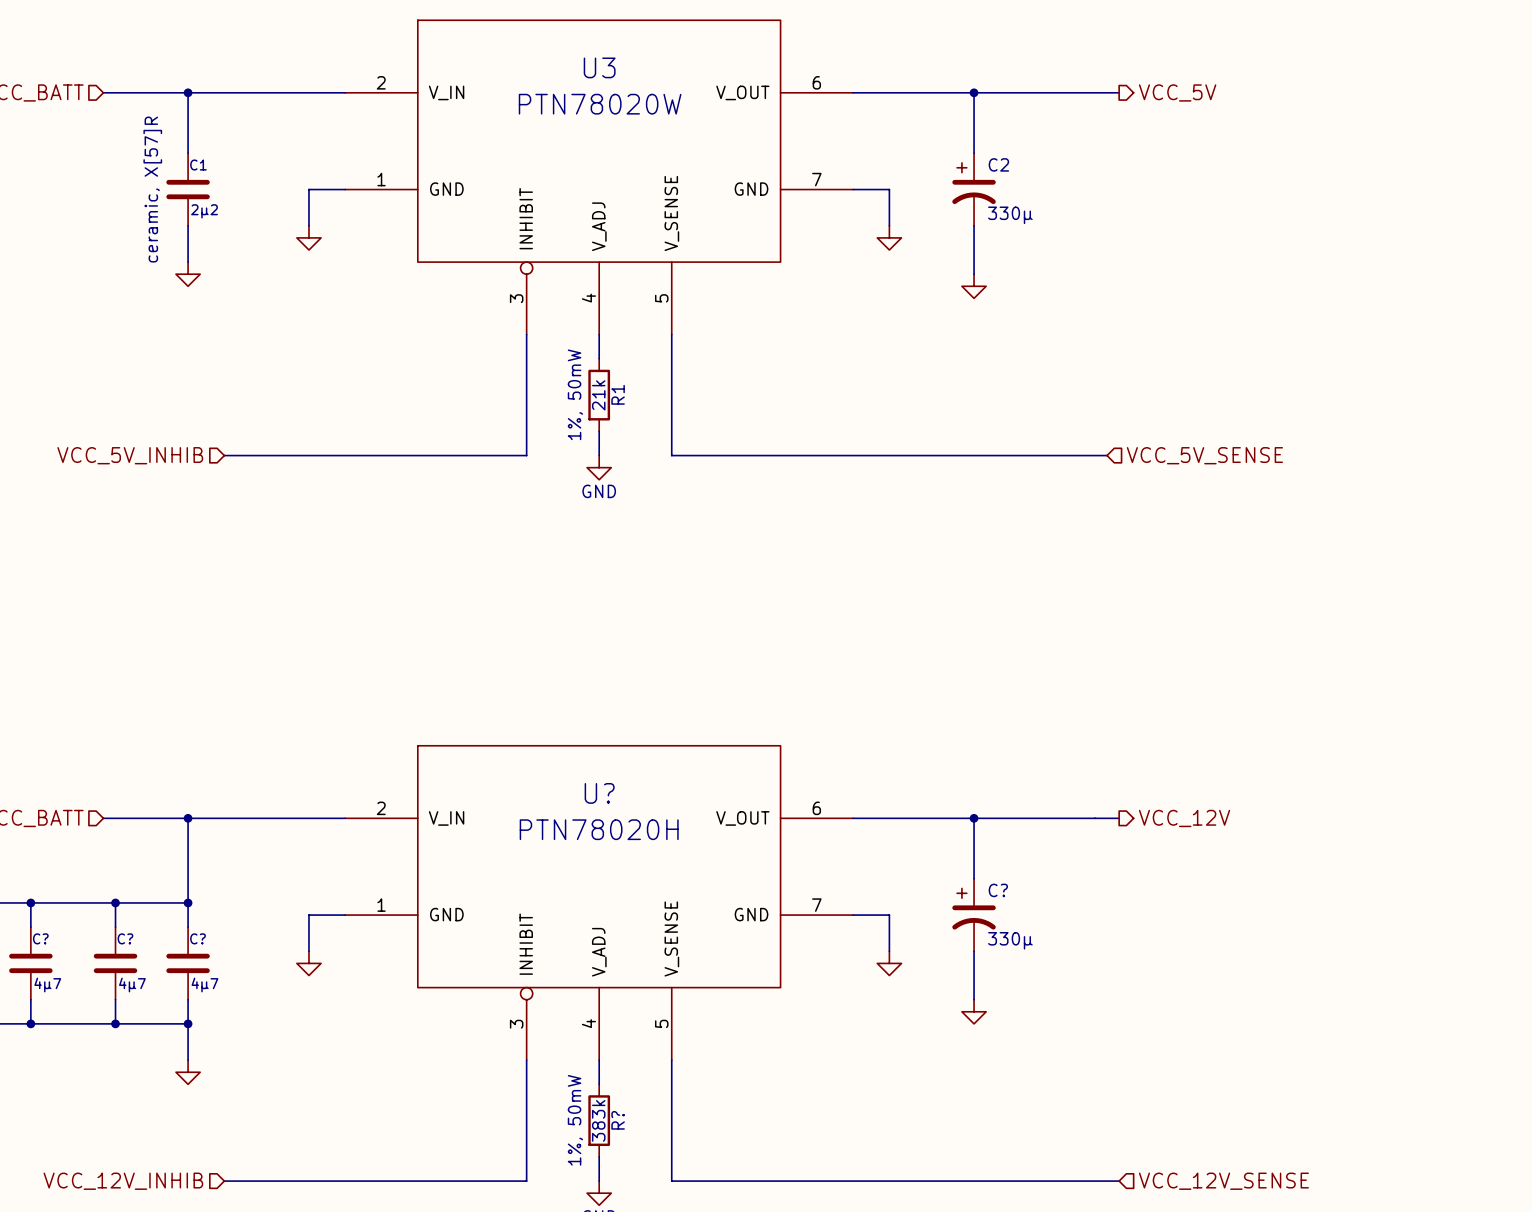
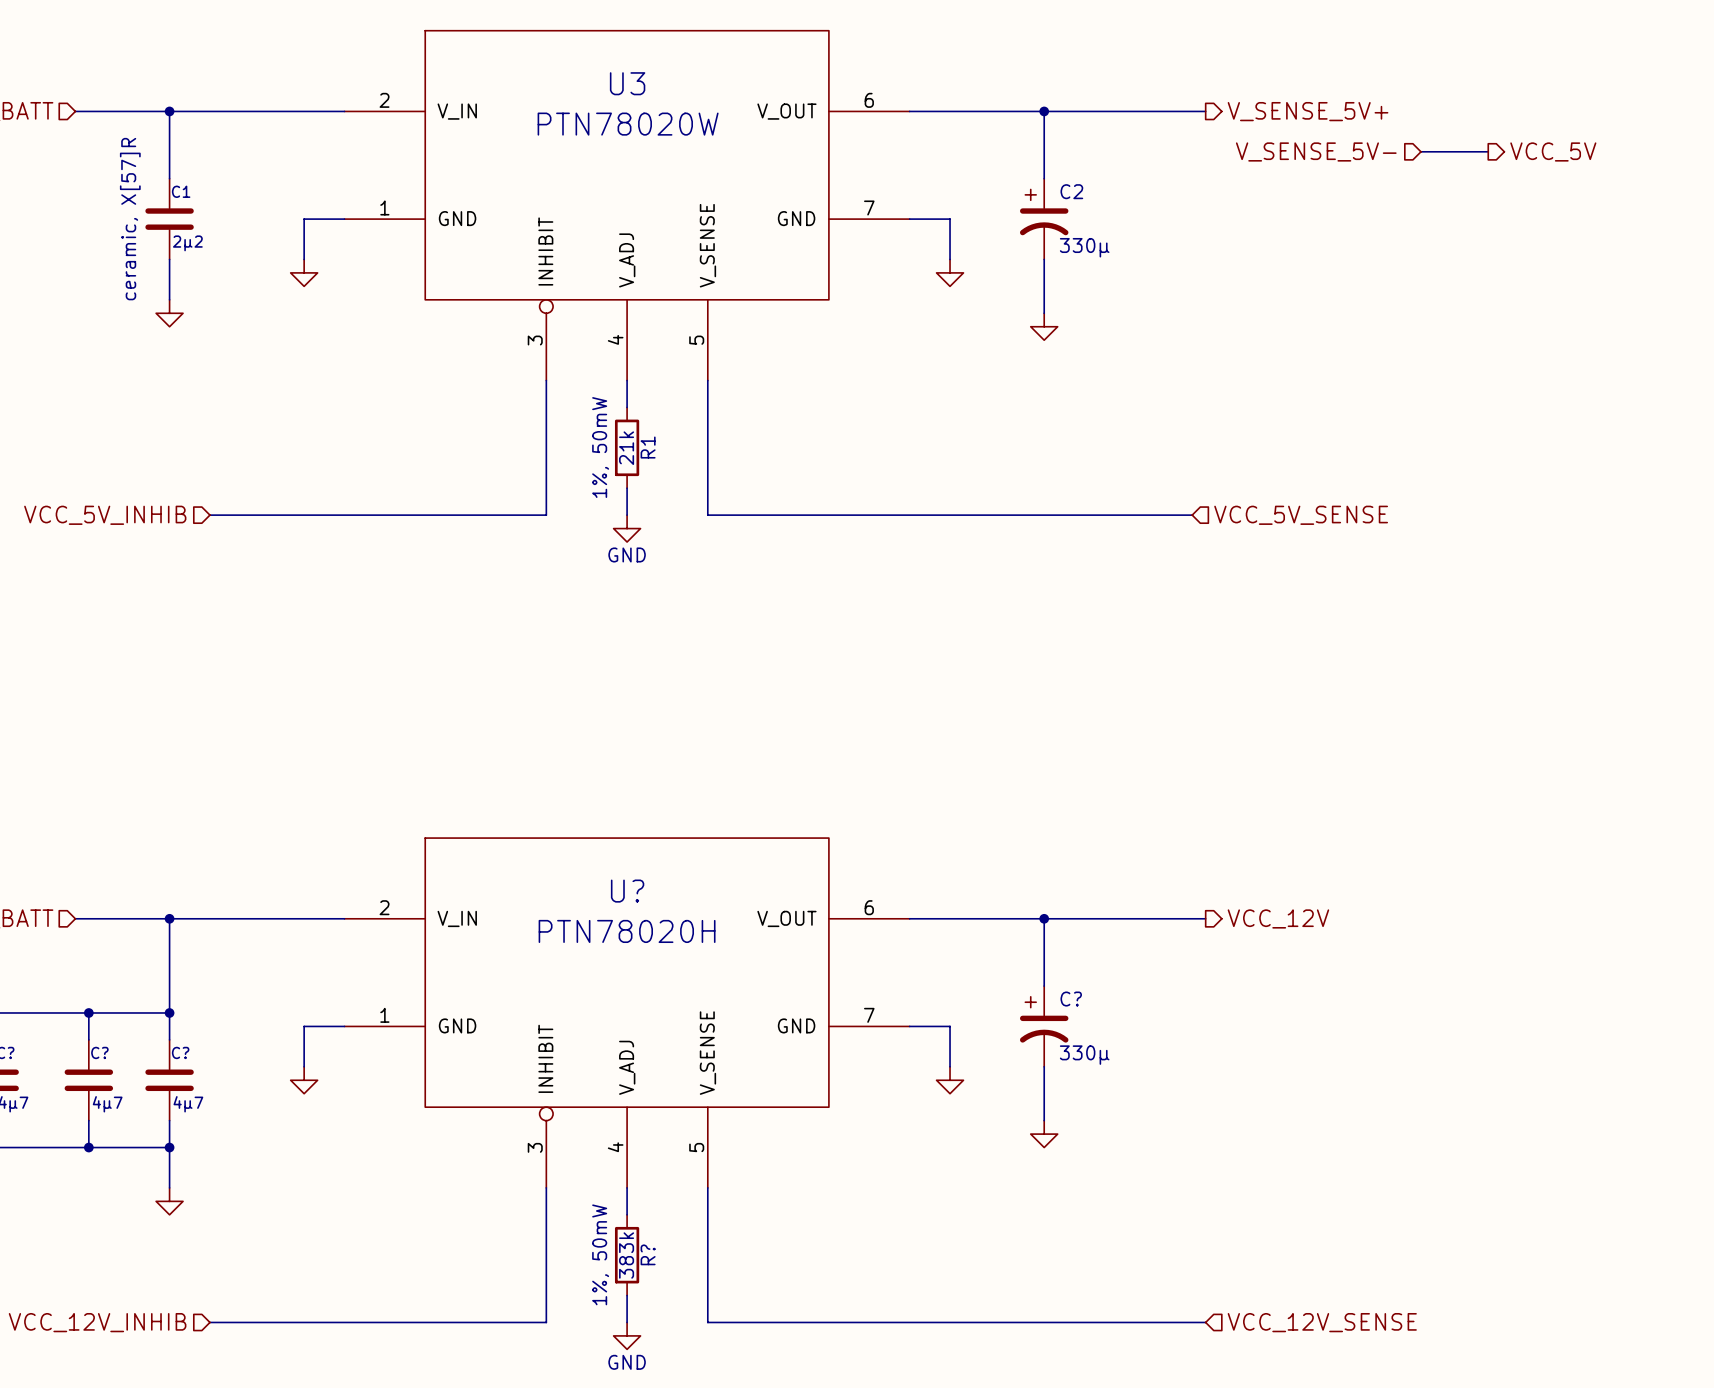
hierarchical label: VCC_5V (1177, 92) -> V_SENSE_5V+ (1308, 111)
hierarchical label: none -> V_SENSE_5V- (1316, 151)
wire: none -> (1420, 151) (1488, 151)
hierarchical label: none -> VCC_5V (1553, 151)

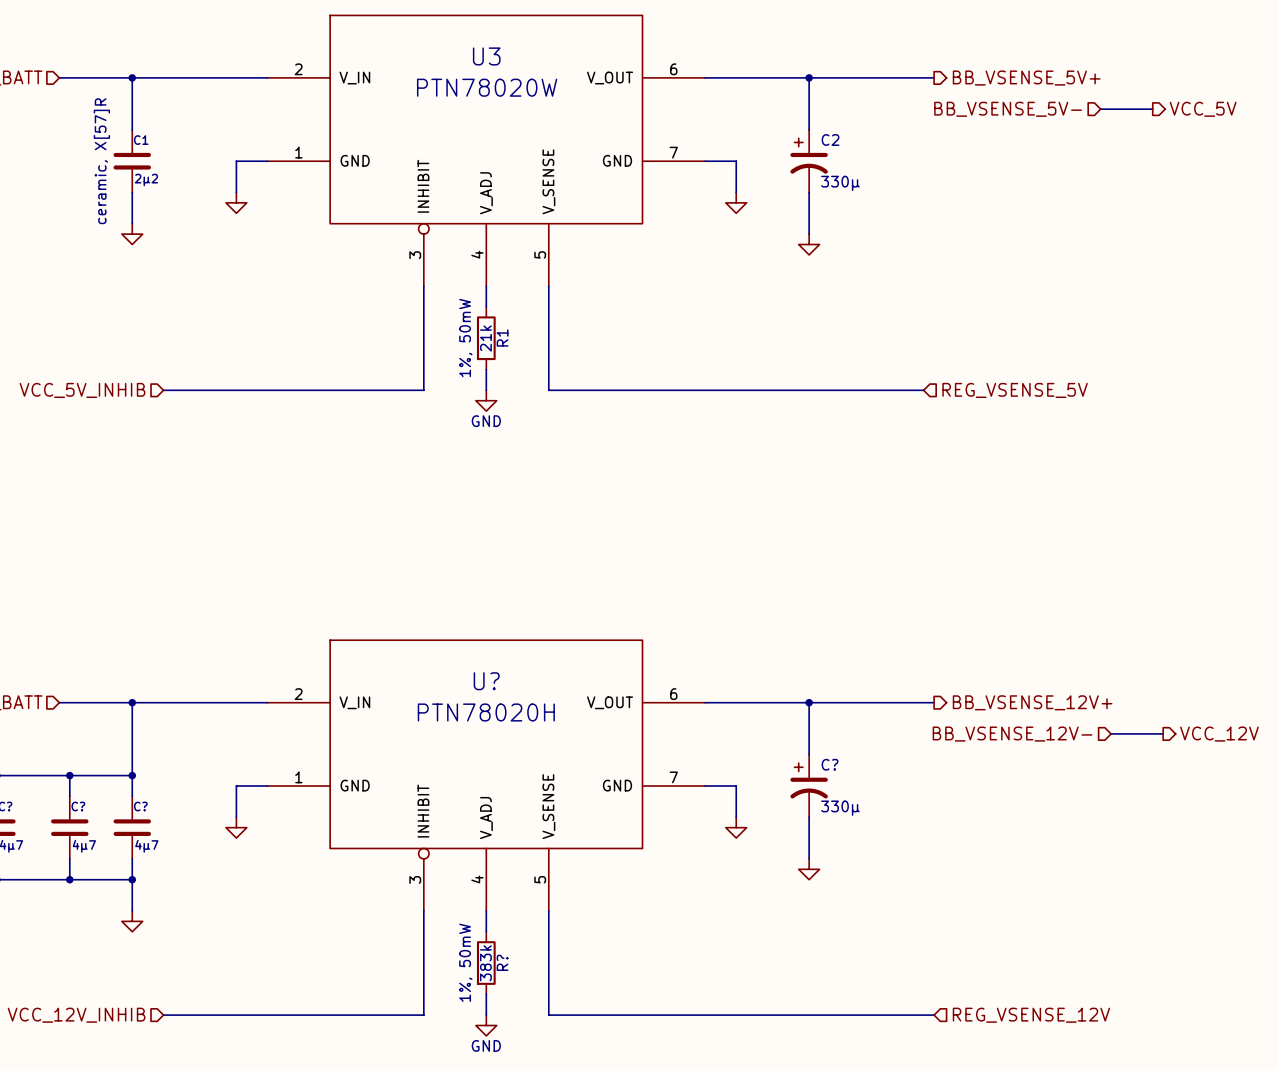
hierarchical label: V_SENSE_5V+ (1308, 111) -> BB_VSENSE_5V+ (1026, 78)
hierarchical label: V_SENSE_5V- (1316, 151) -> BB_VSENSE_5V- (1008, 109)
hierarchical label: VCC_5V_SENSE (1301, 515) -> REG_VSENSE_5V (1015, 390)
hierarchical label: VCC_12V (1278, 918) -> BB_VSENSE_12V+ (1032, 702)
hierarchical label: none -> BB_VSENSE_12V- (1012, 734)
wire: none -> (1111, 733) (1163, 733)
hierarchical label: none -> VCC_12V (1219, 734)
hierarchical label: VCC_12V_SENSE (1322, 1322) -> REG_VSENSE_12V (1031, 1015)

